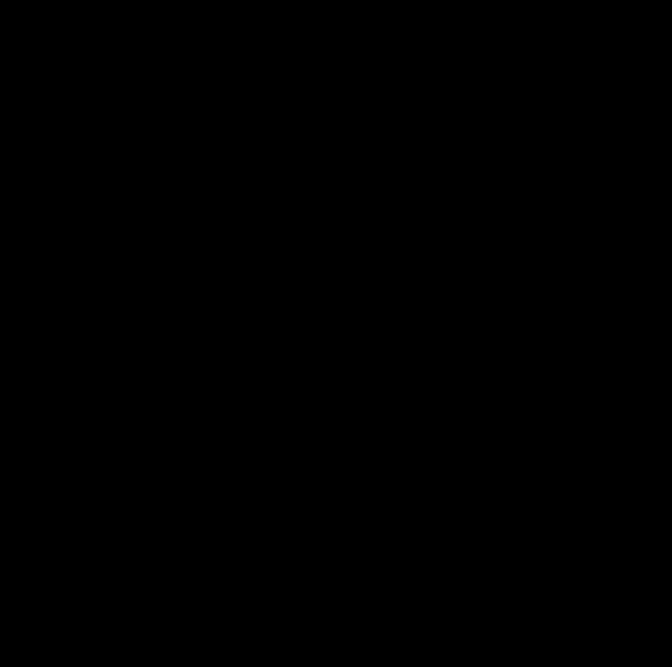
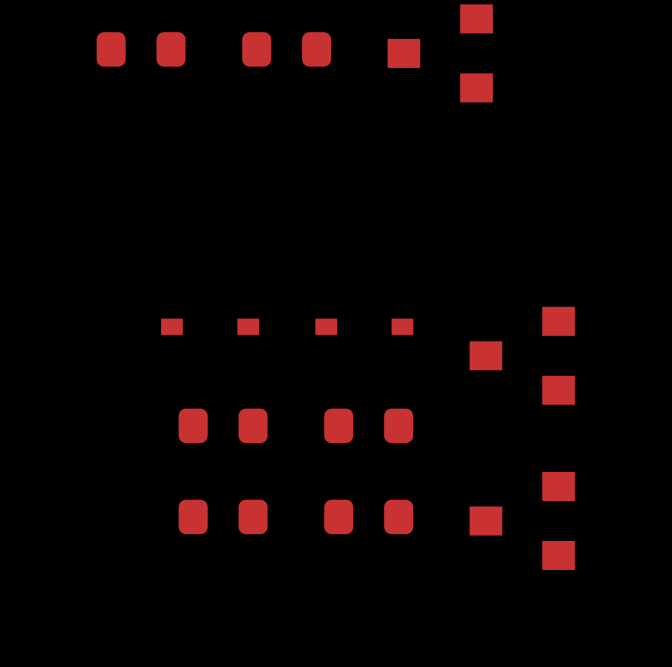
part: none -> (141, 49)
part: none -> (286, 49)
part: none -> (440, 53)
part: none -> (210, 326)
part: none -> (364, 326)
part: none -> (522, 355)
part: none -> (223, 425)
part: none -> (368, 425)
part: none -> (223, 516)
part: none -> (368, 516)
part: none -> (522, 520)

